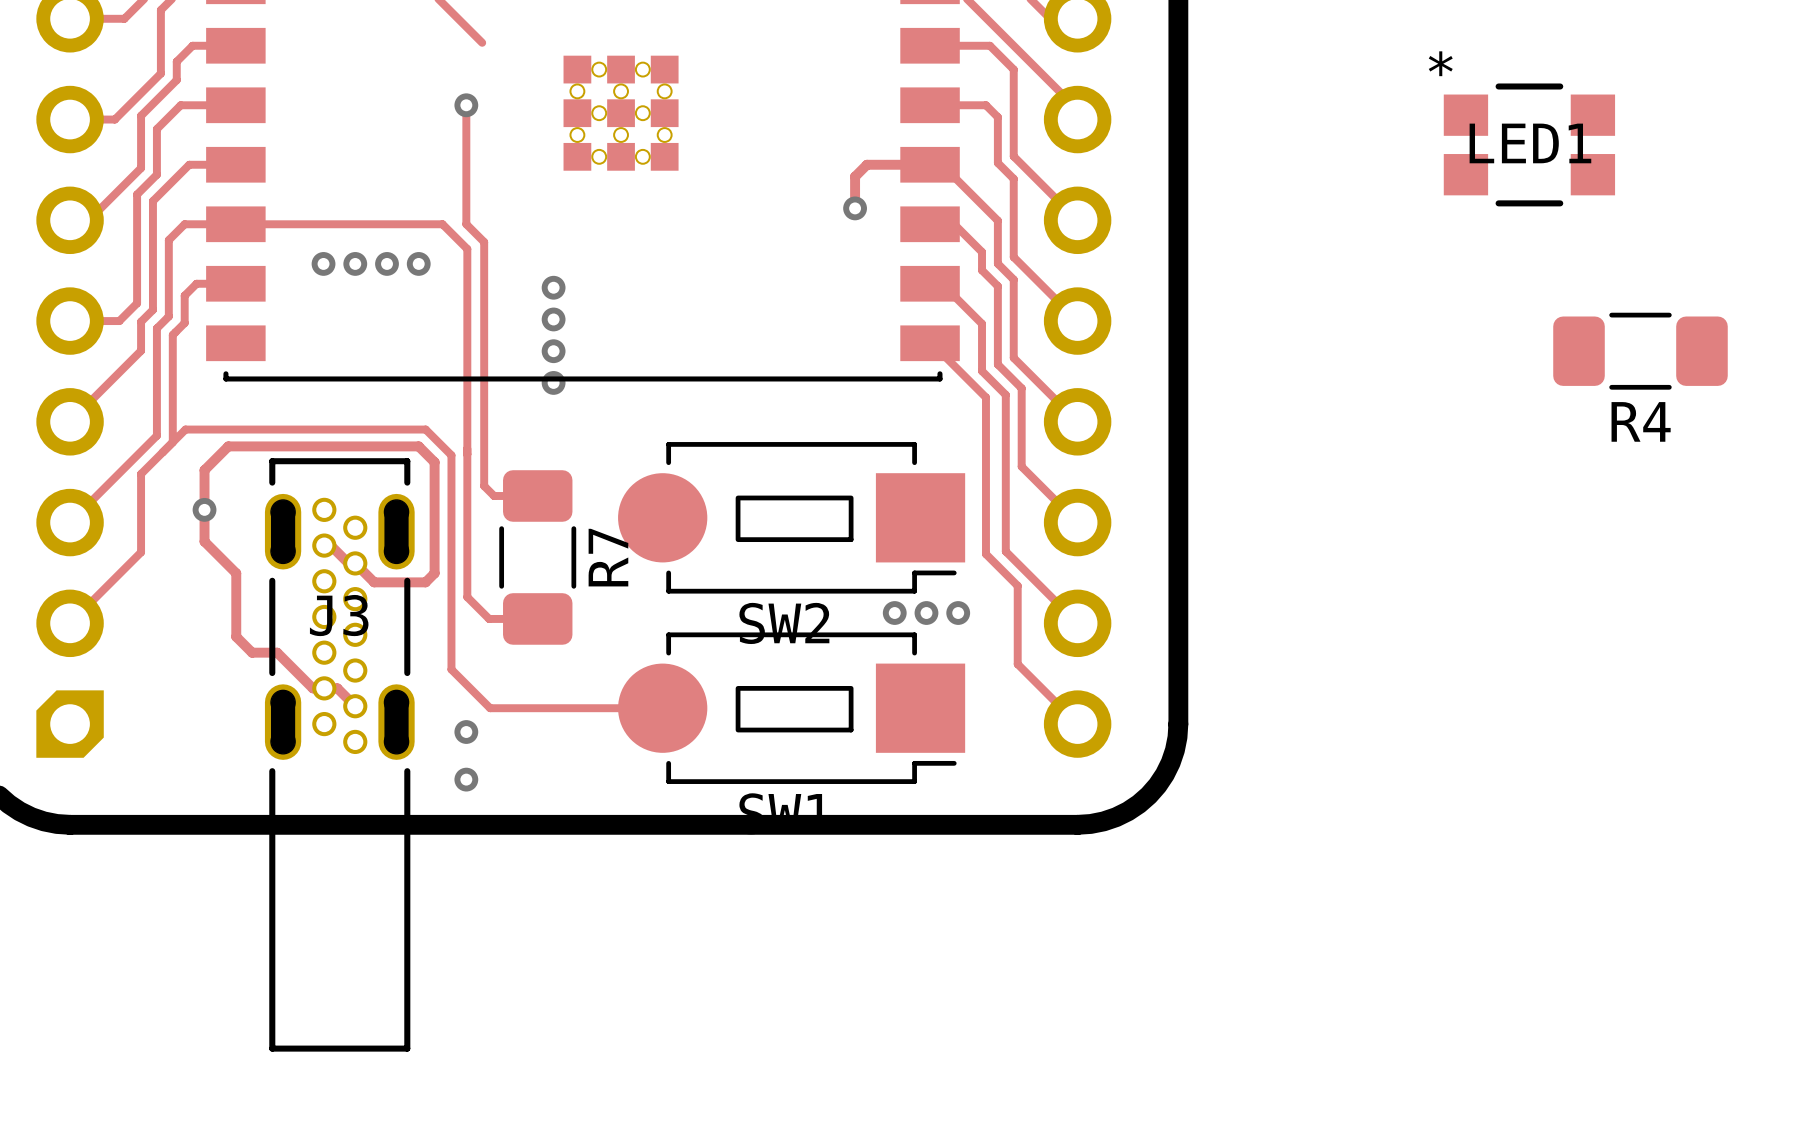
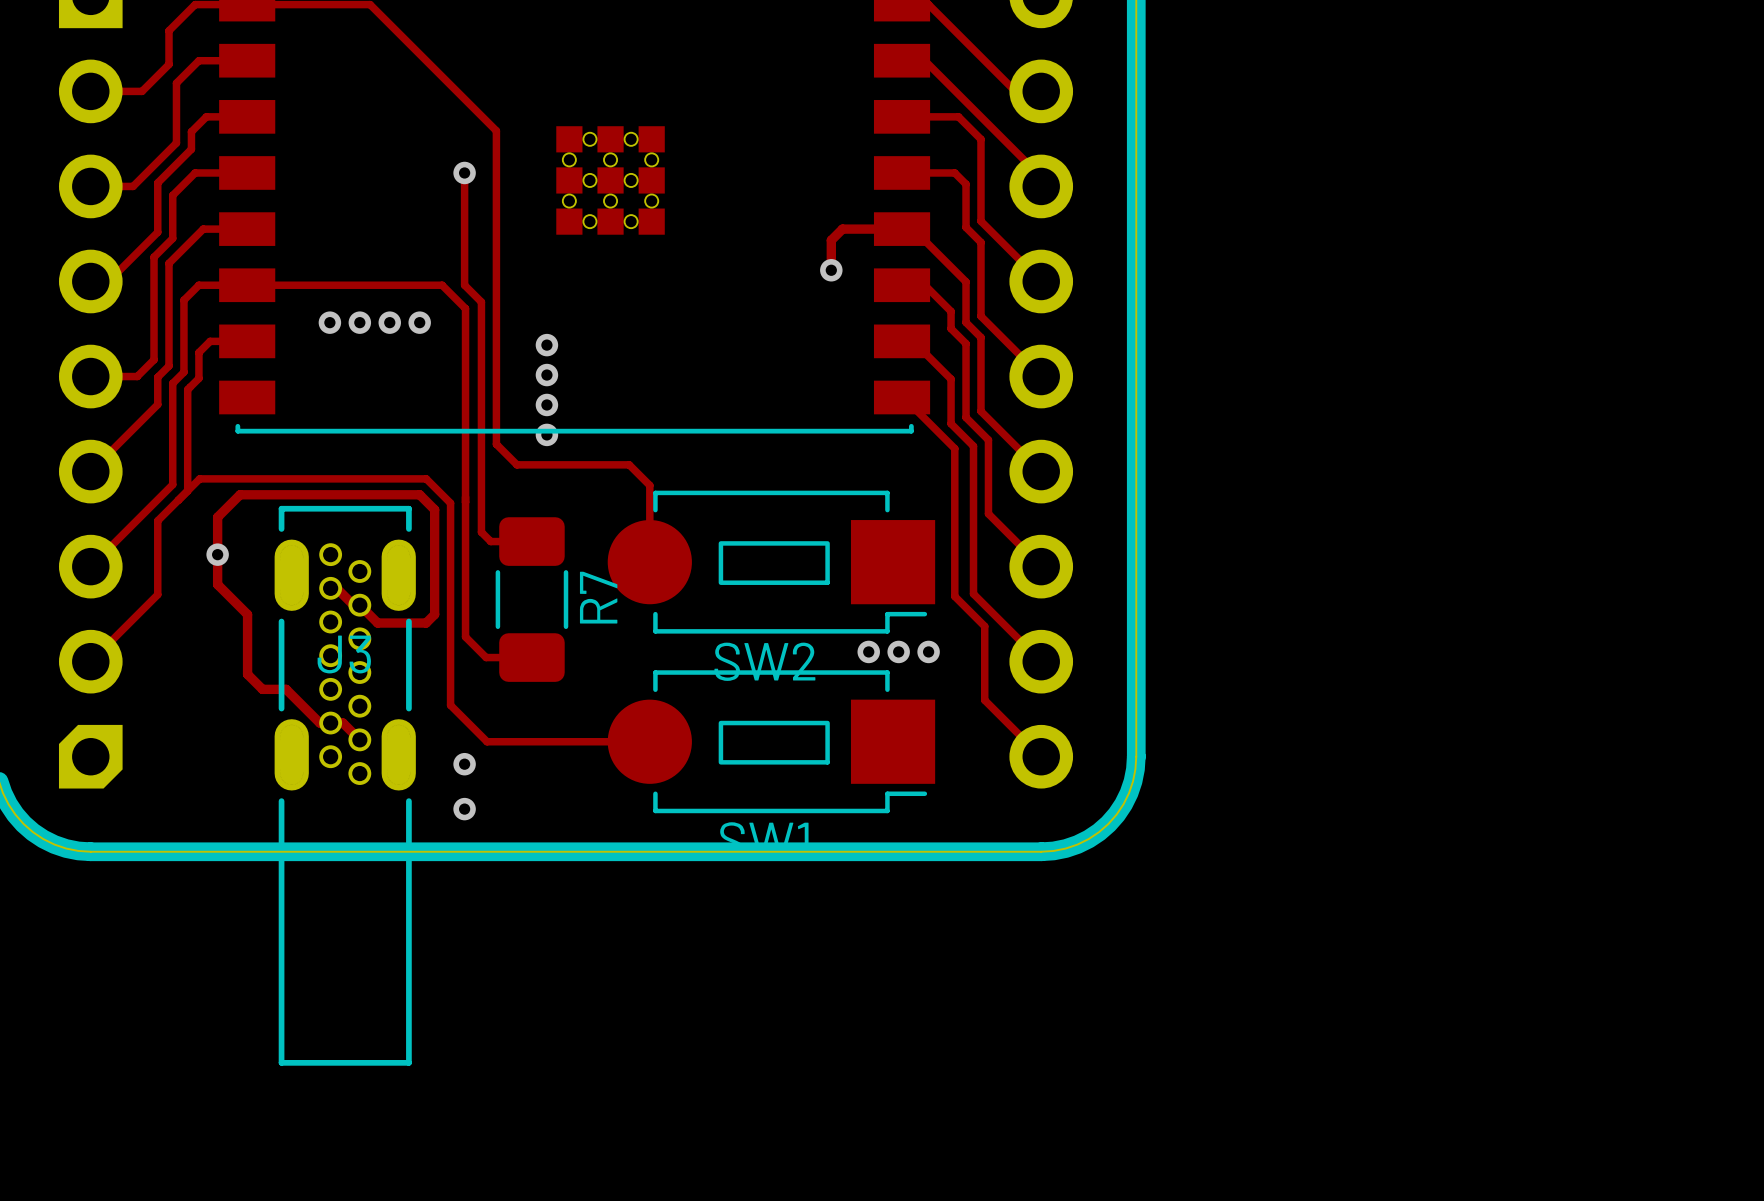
track: none -> (479, 114) (496, 130) (496, 444) (516, 464) (629, 464) (649, 485) (649, 562)
LED1: (1529, 144) -> none
R4: (1640, 351) -> none

